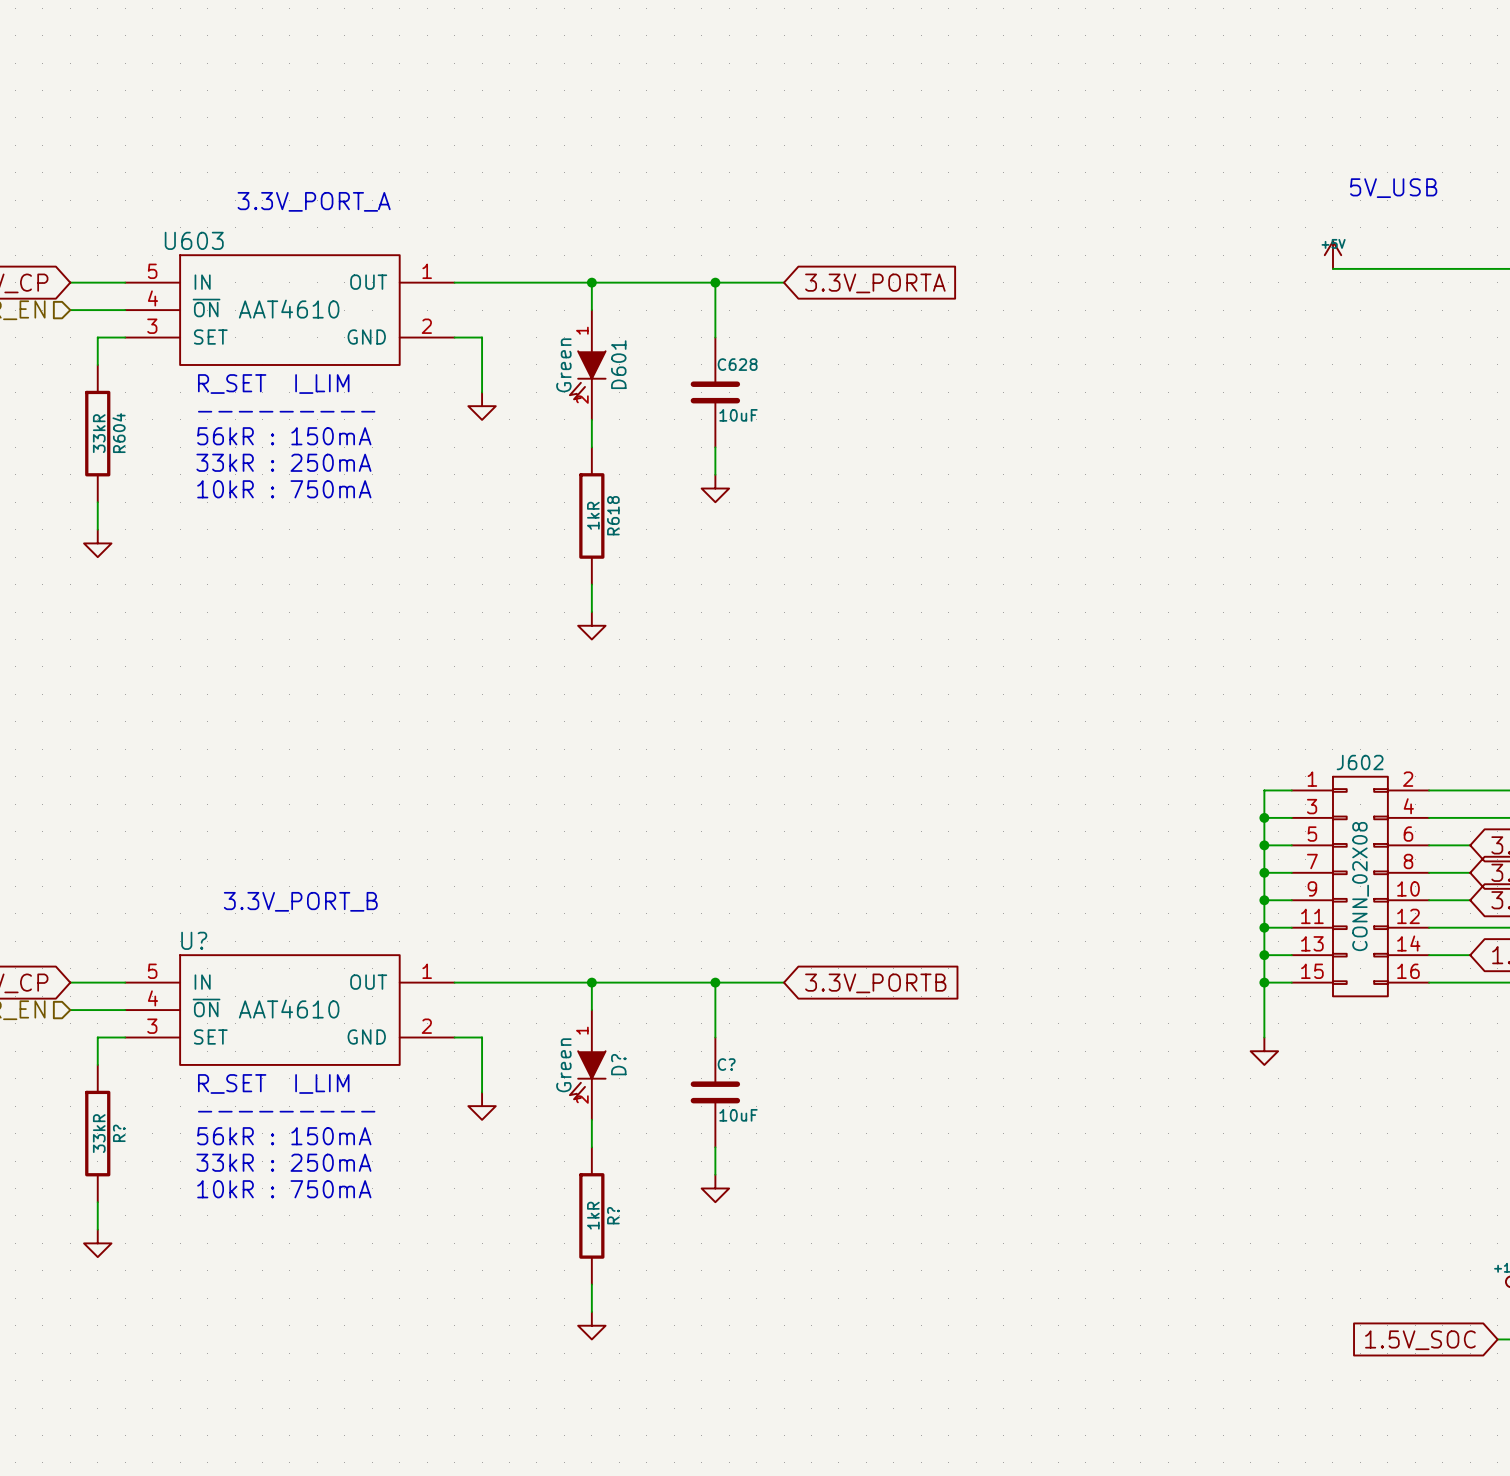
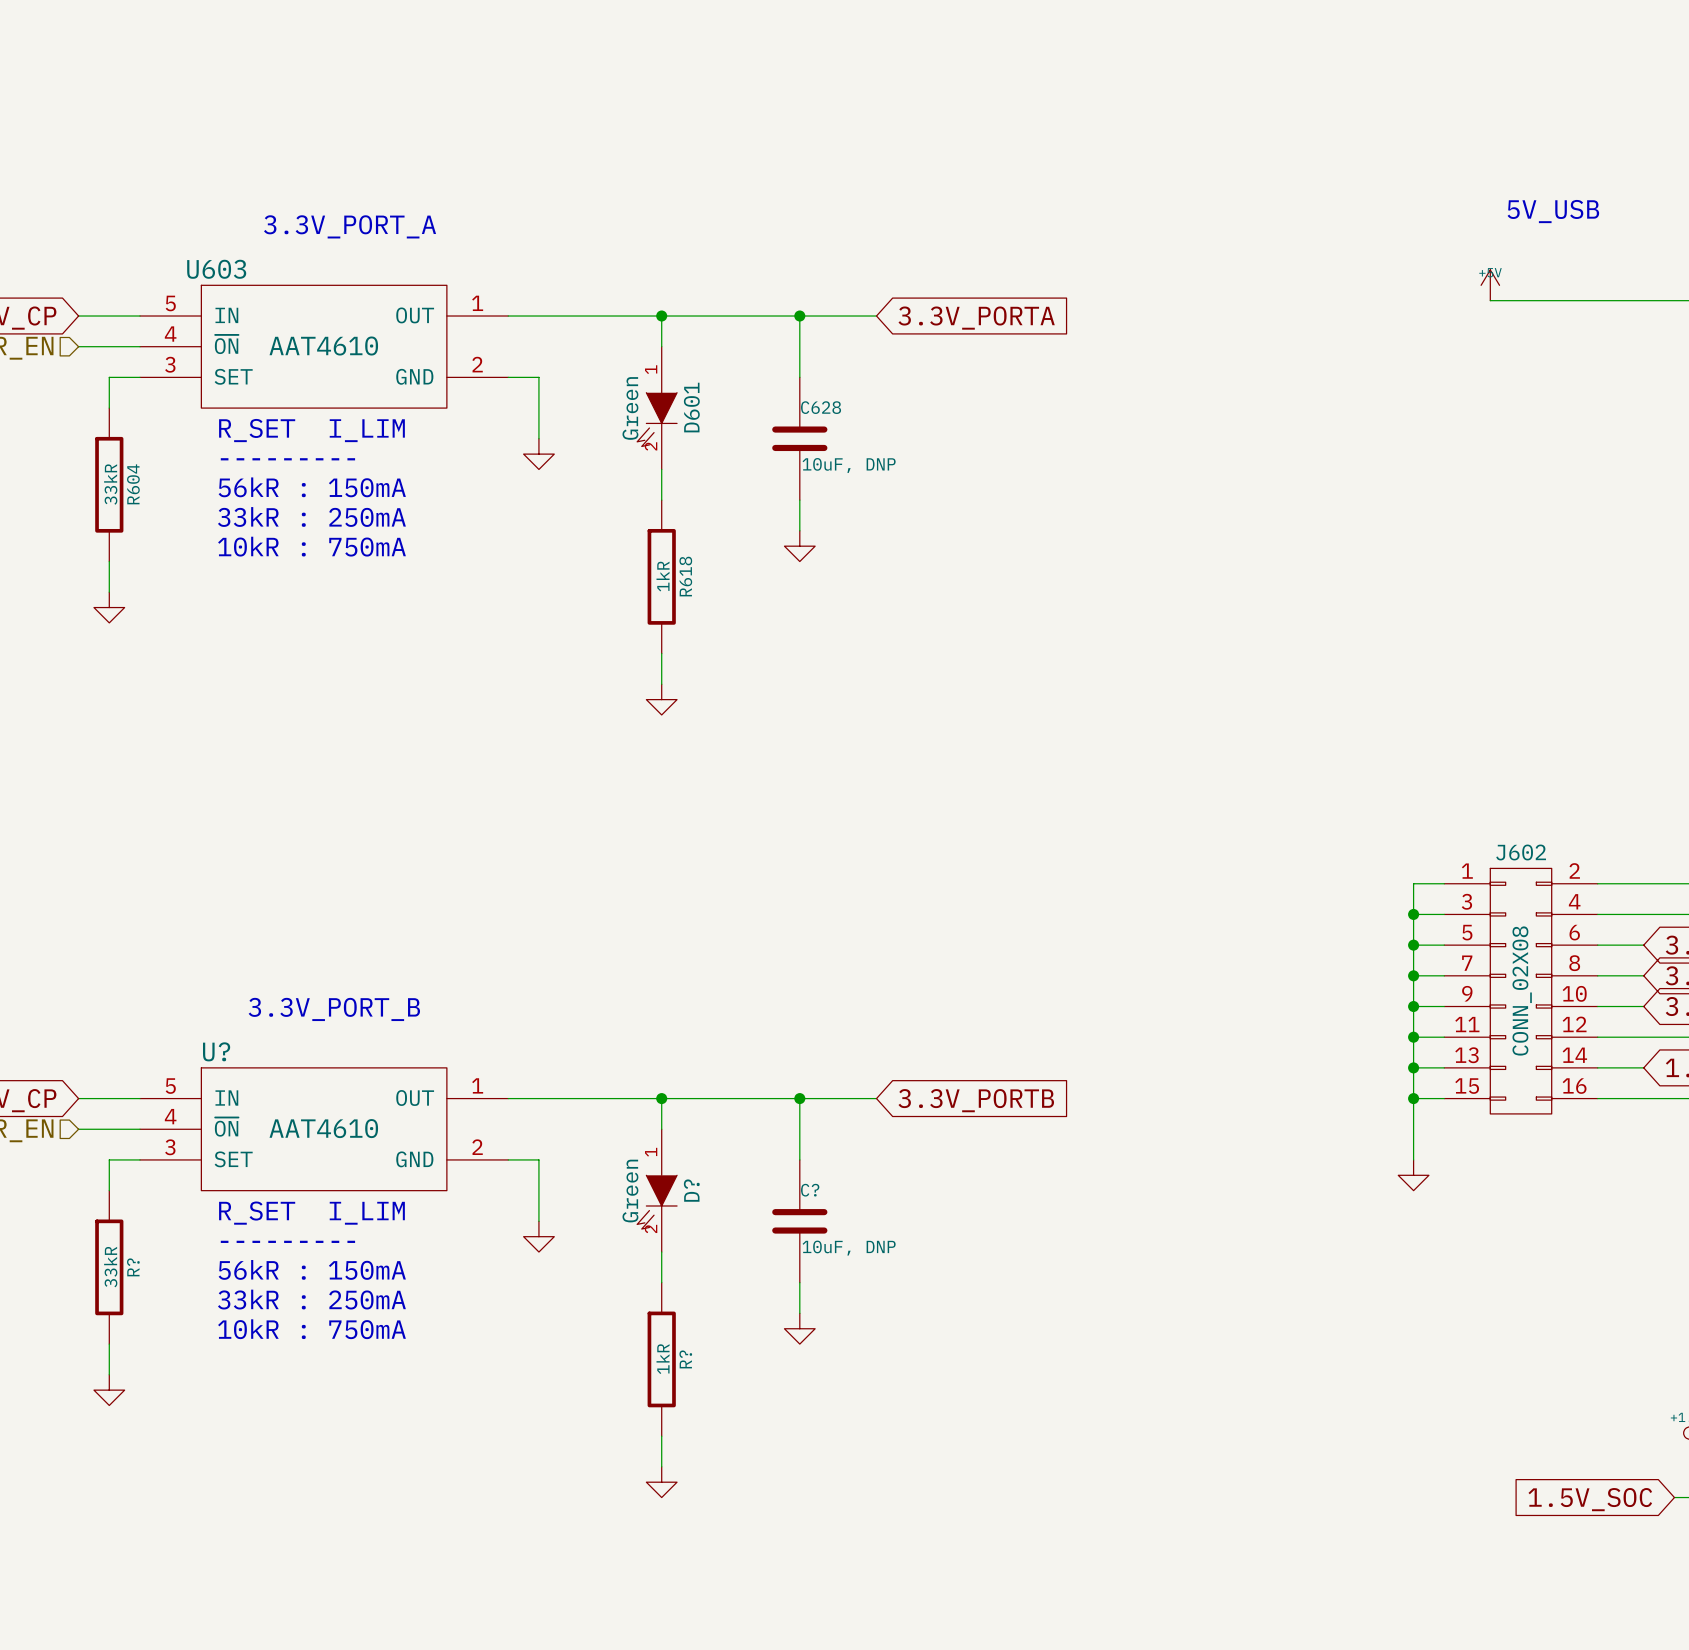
C628 value: 10uF (738, 415) -> 10uF, DNP (849, 465)
C? value: 10uF (738, 1115) -> 10uF, DNP (849, 1248)

